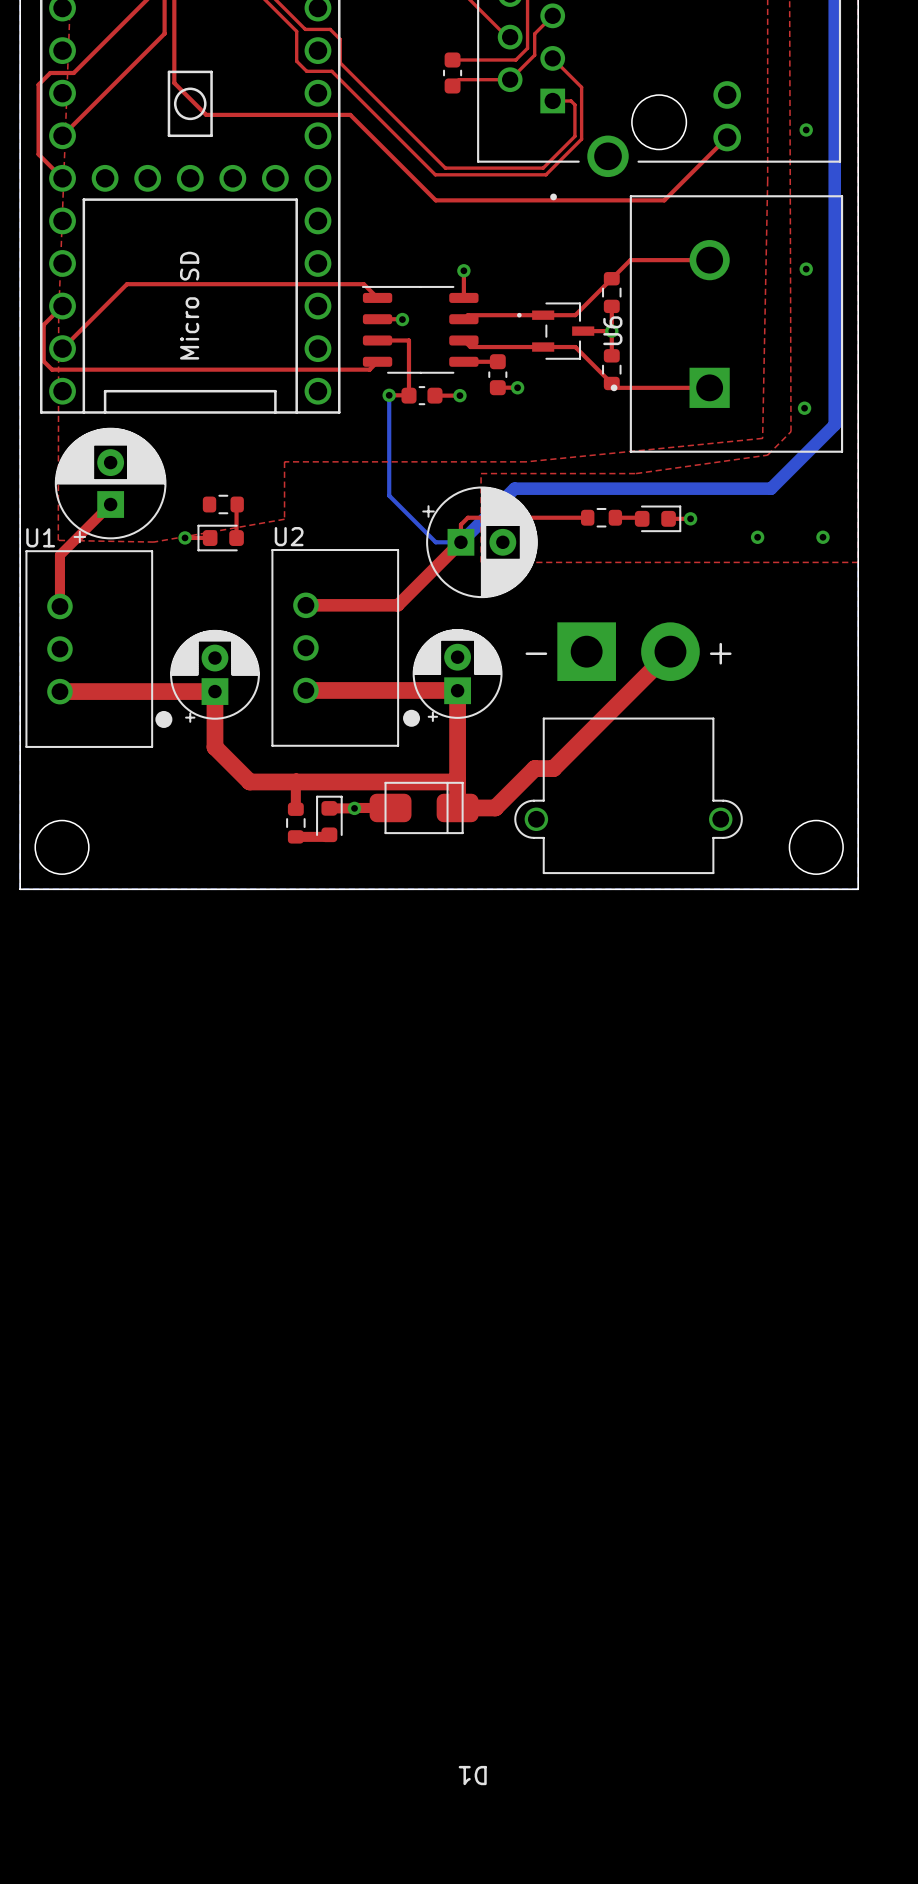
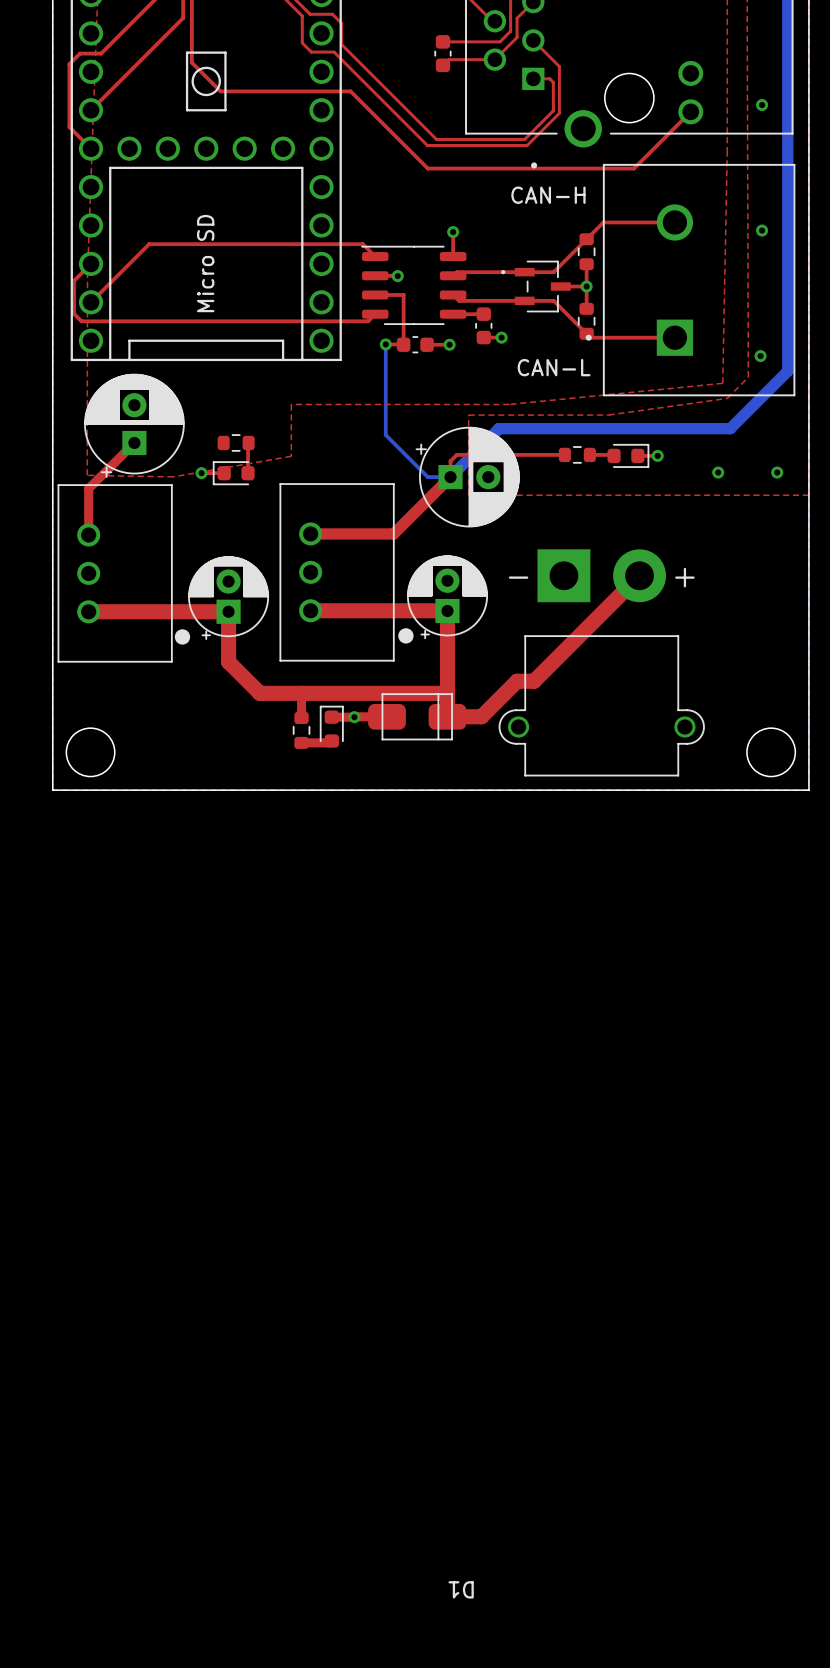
text: none -> CAN-H (548, 195)
U6 name: U6 (612, 330) -> none
text: none -> CAN-L (554, 367)
U2 name: U2 (289, 536) -> none
U1 name: U1 (40, 537) -> none

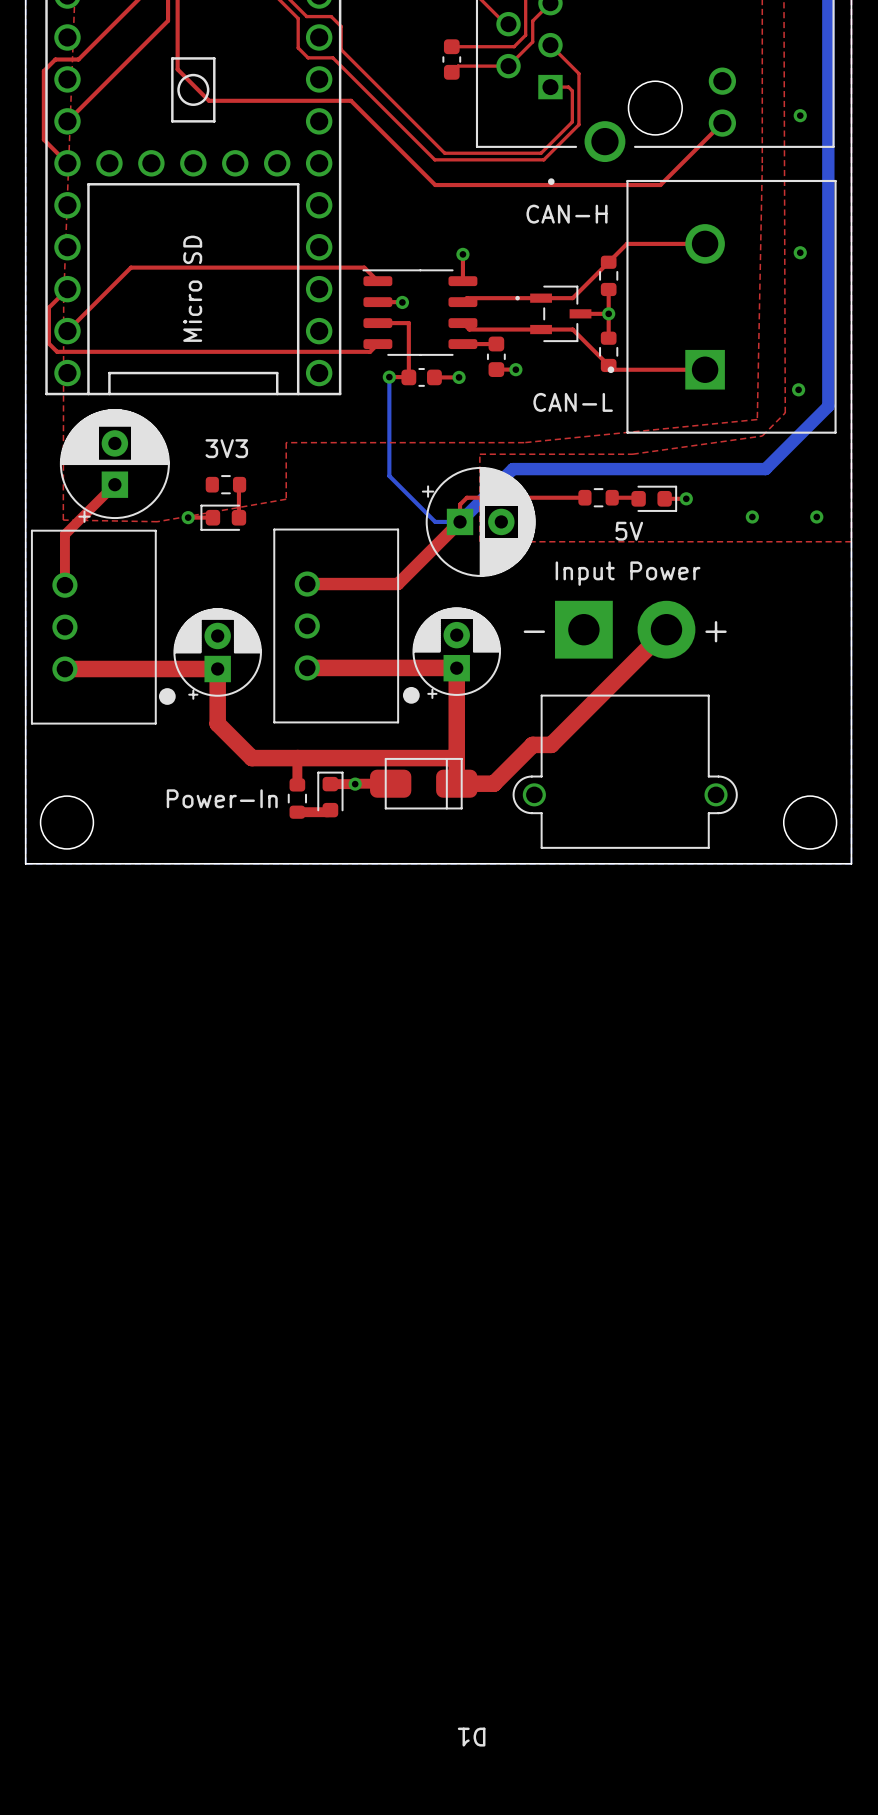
text: none -> 3V3 (226, 448)
text: none -> 5V (629, 531)
text: none -> Input Power (628, 573)
text: none -> Power-In (222, 798)

